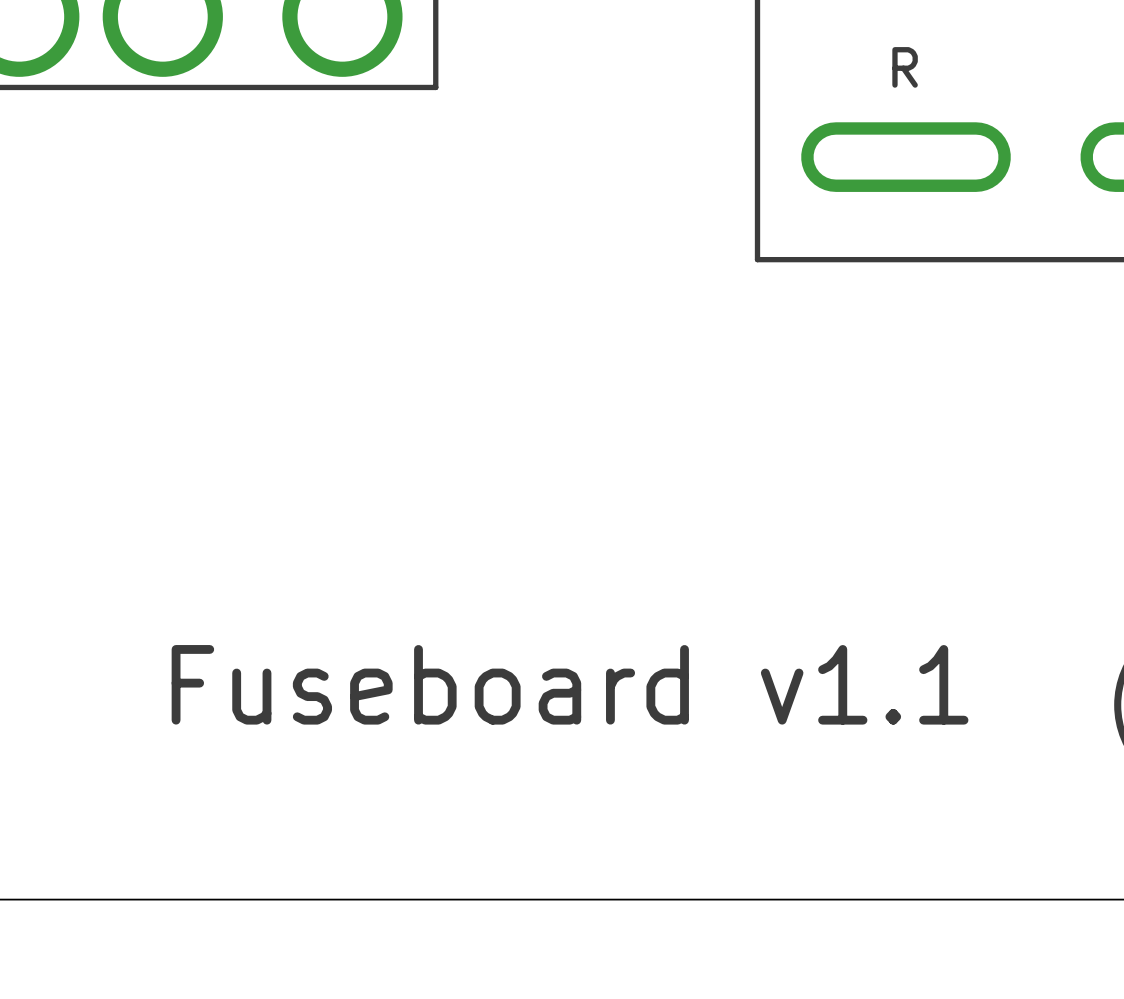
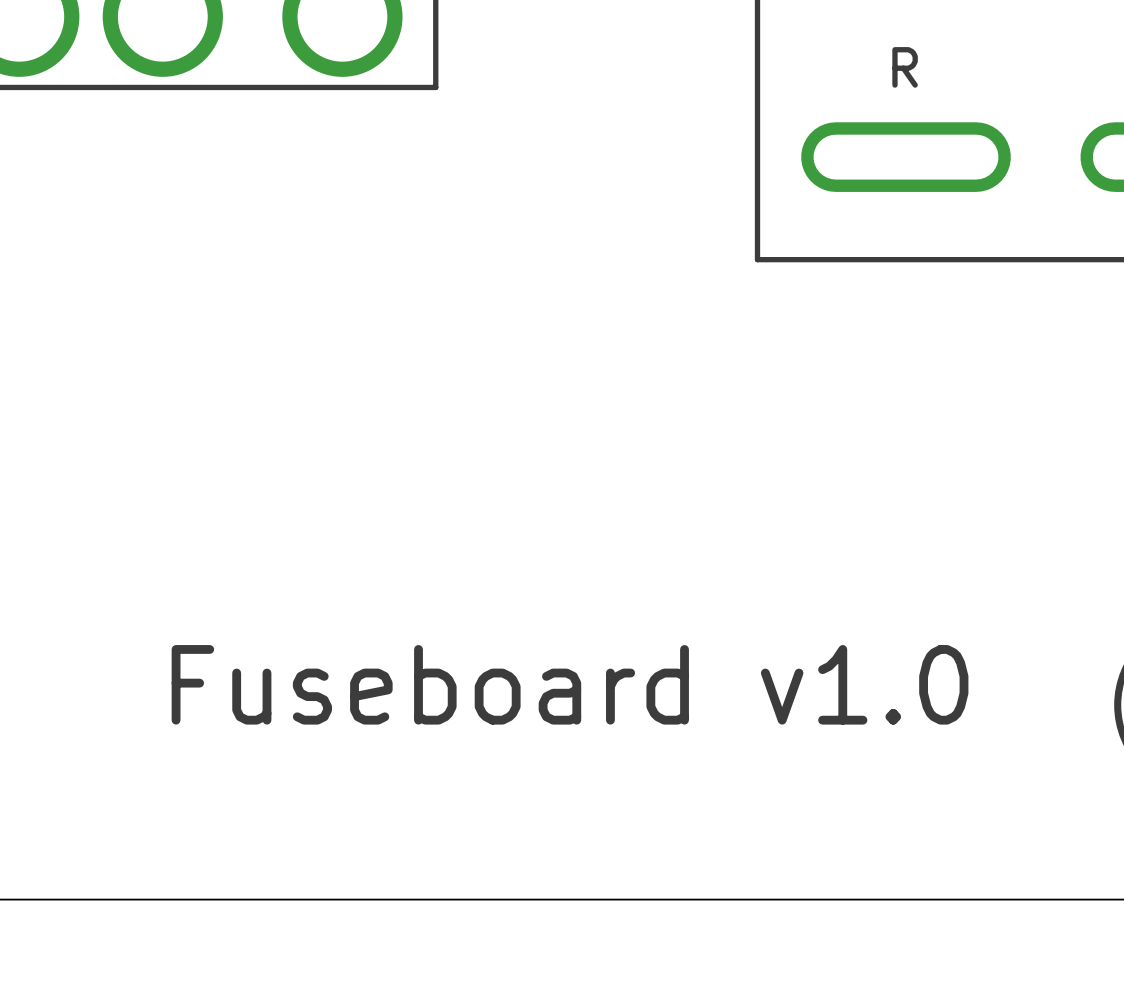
text: Fuseboard v1.1 (570, 684) -> Fuseboard v1.0 (570, 684)

